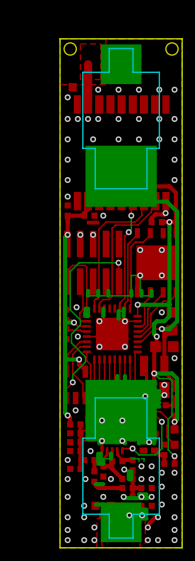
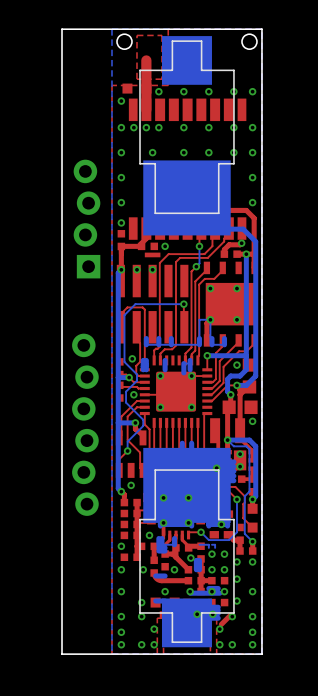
board edge: (60, 38) (60, 547) -> (111, 29) (62, 29) (62, 654) (111, 654)
part: none -> (87, 219)
part: none -> (85, 424)

